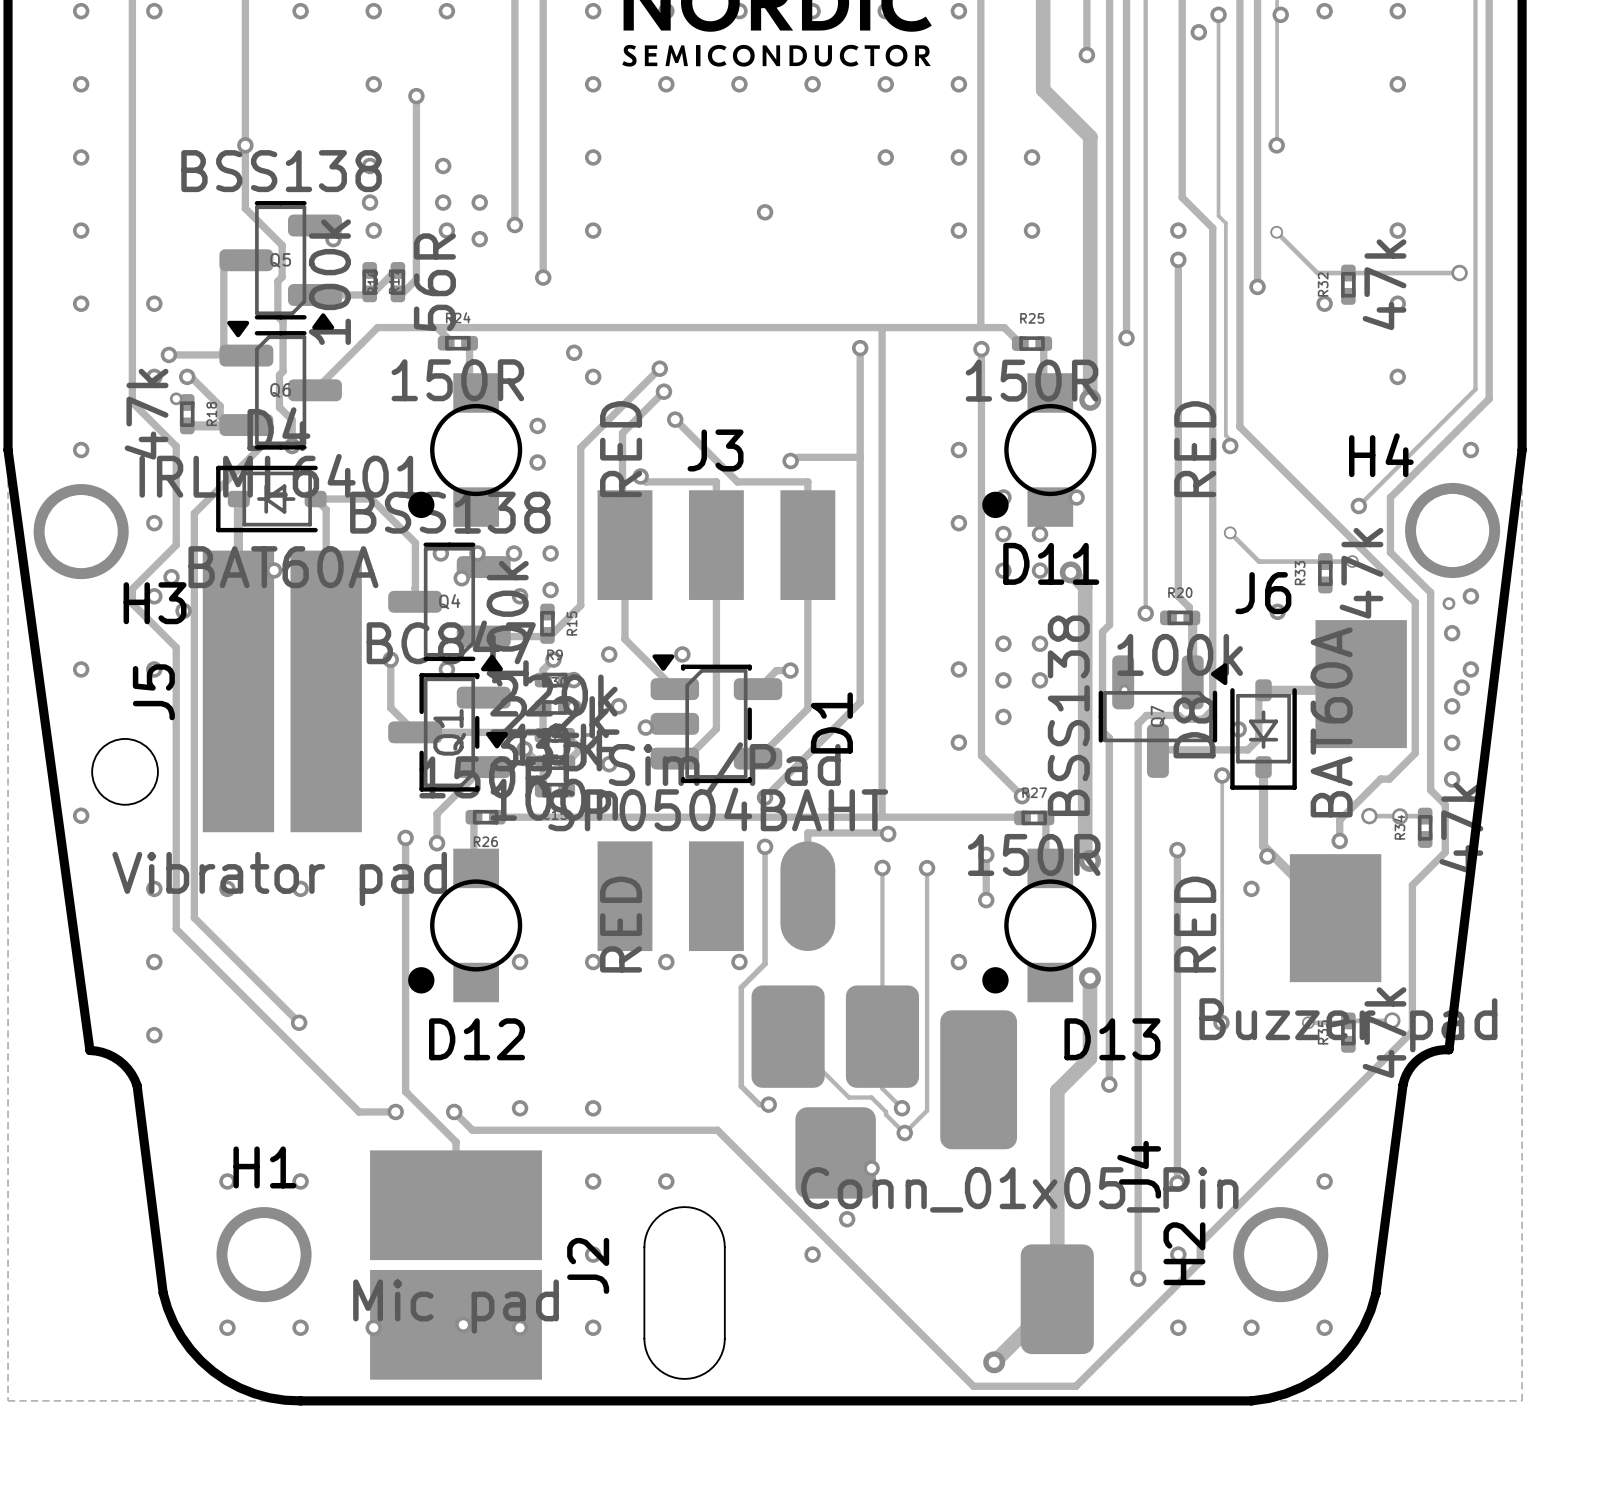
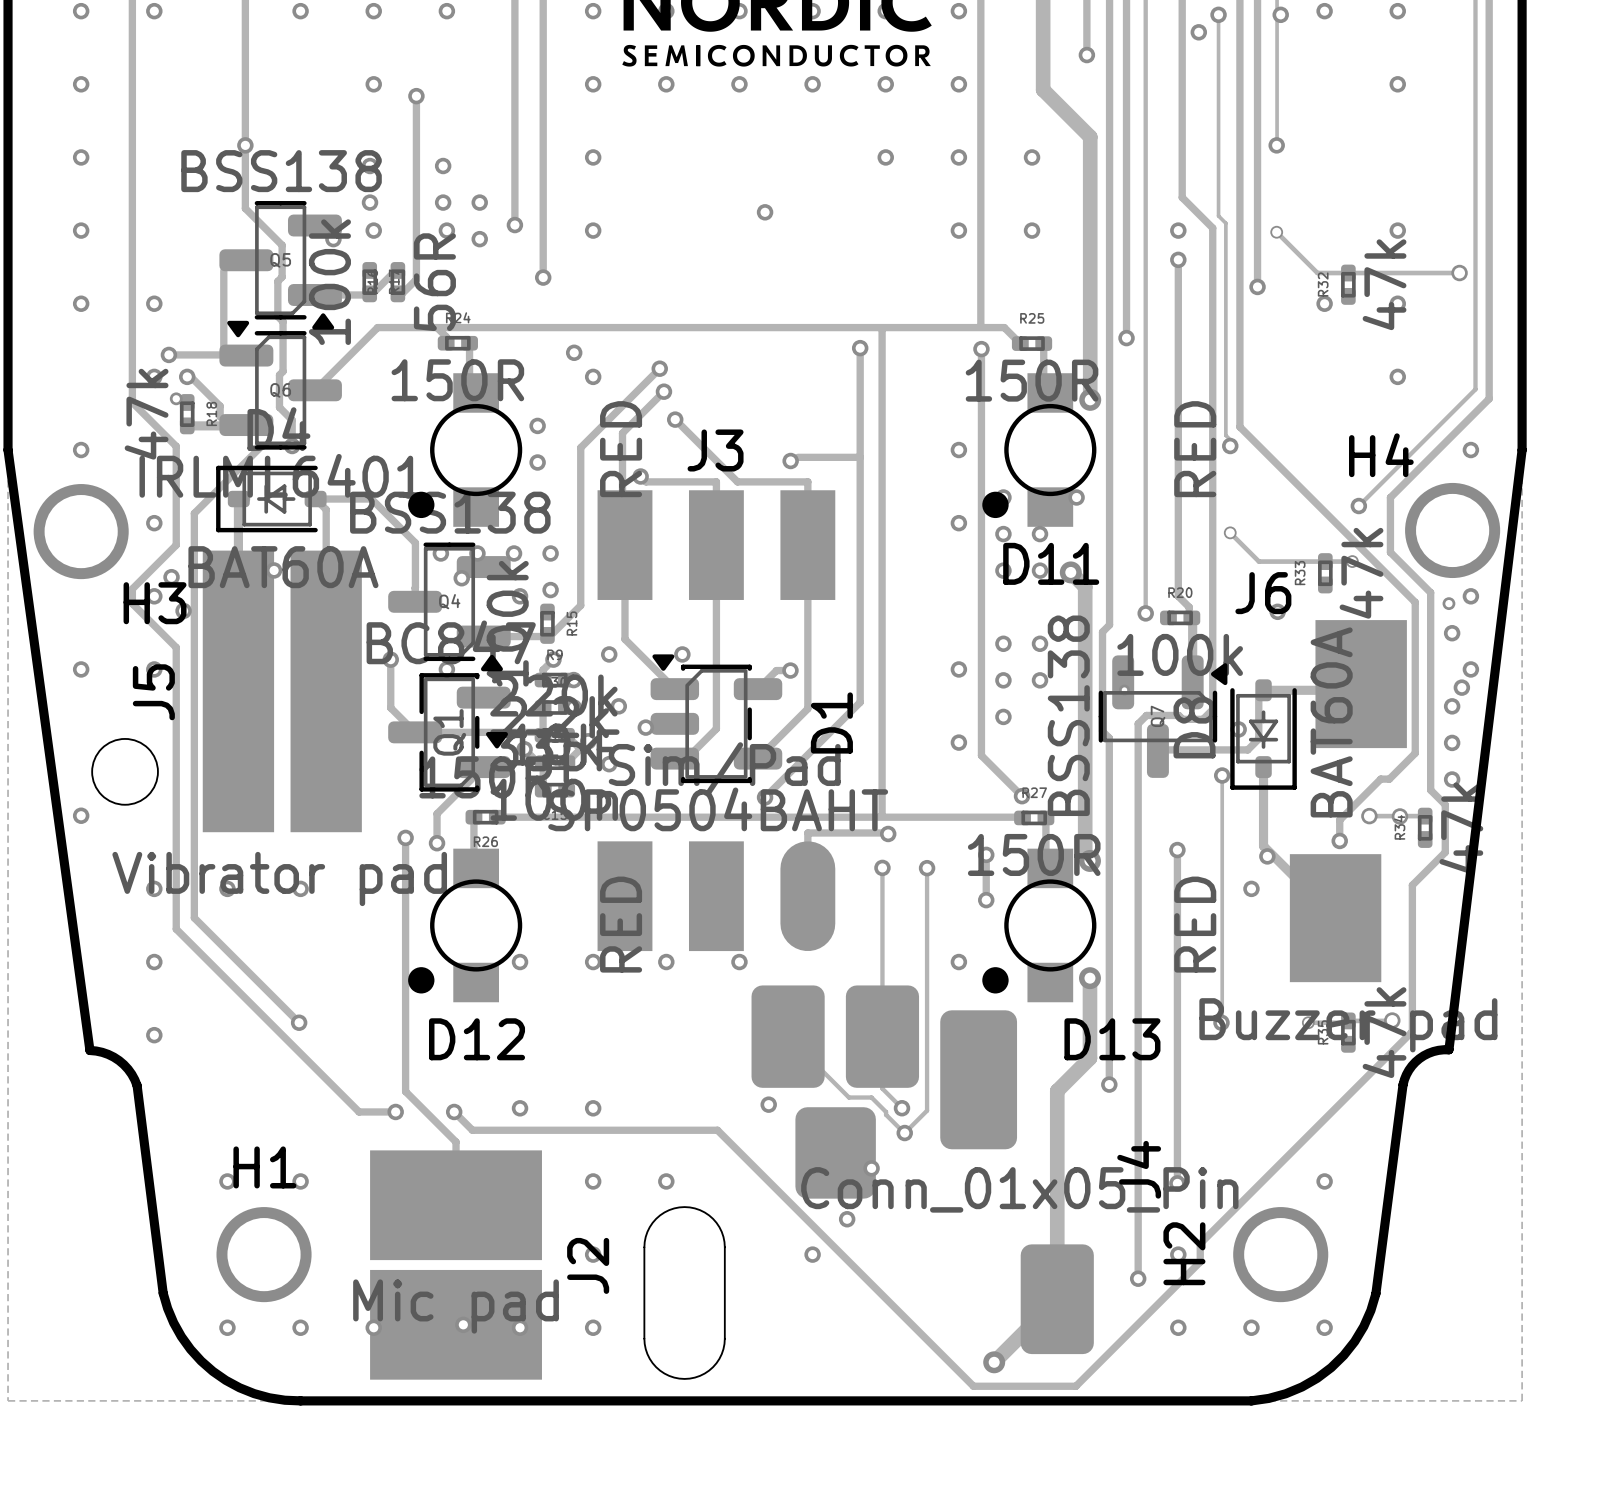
track: (765, 846) (765, 963) (741, 987) (741, 1086) (759, 1104) (768, 1104) -> none
via: (765, 846) -> none

